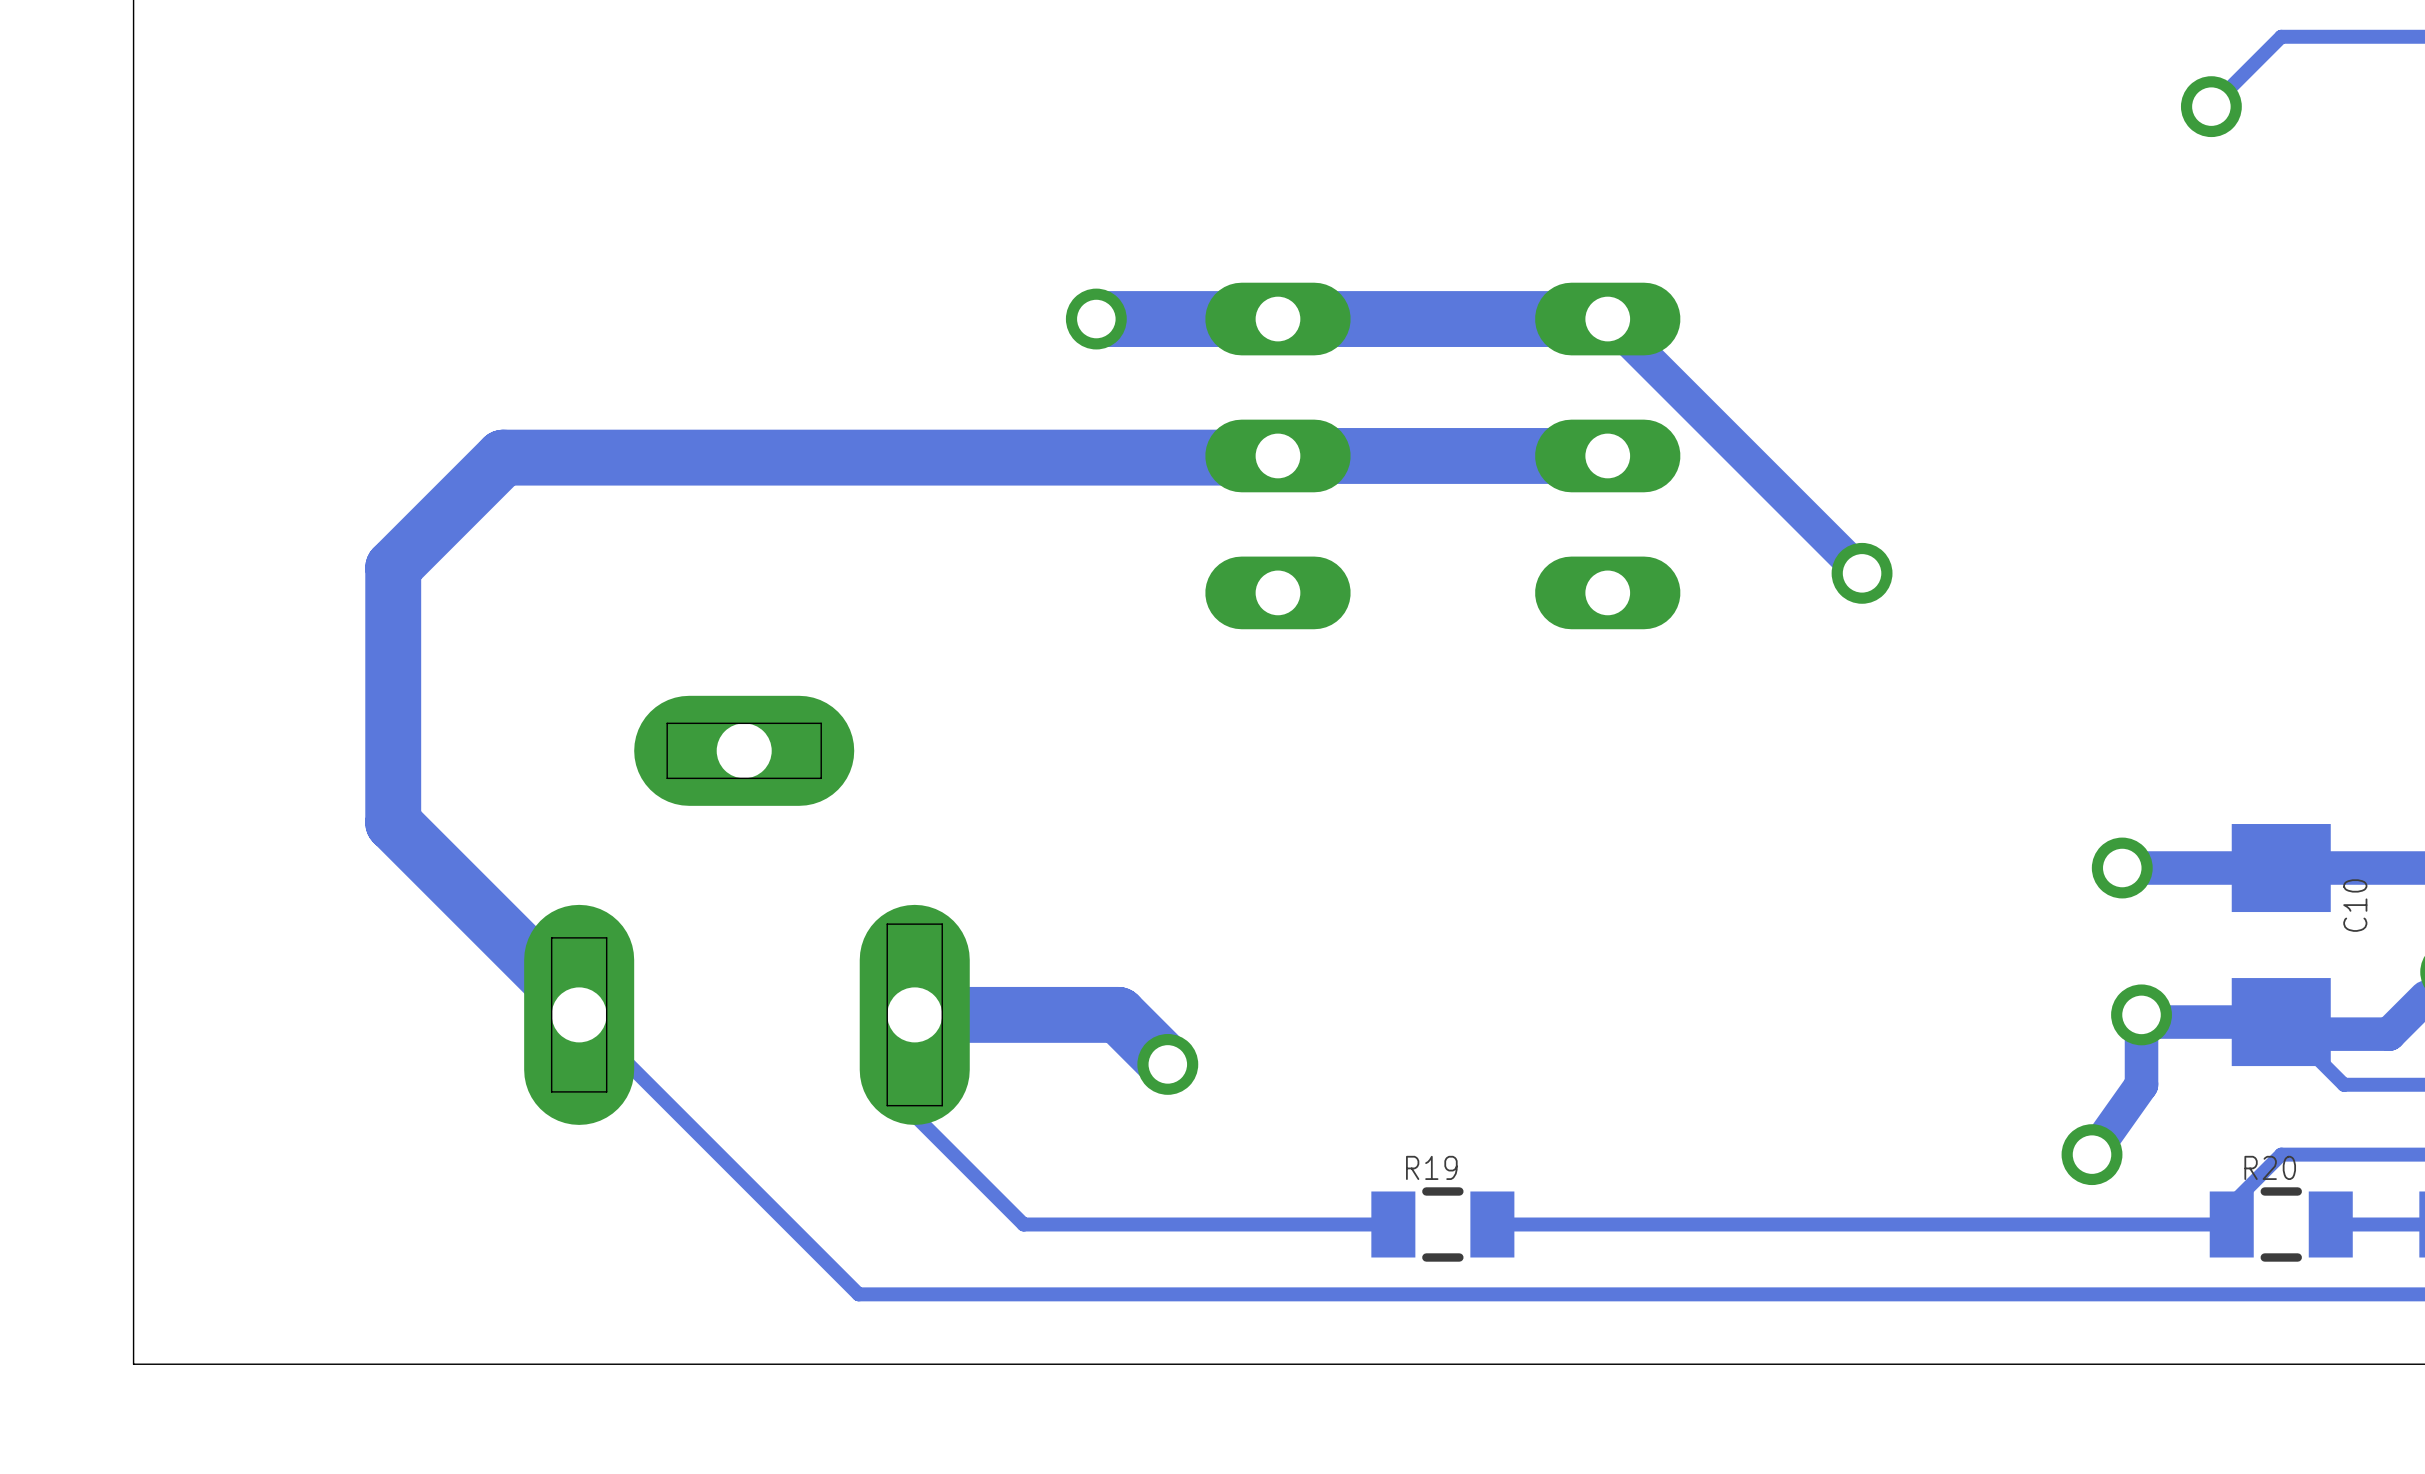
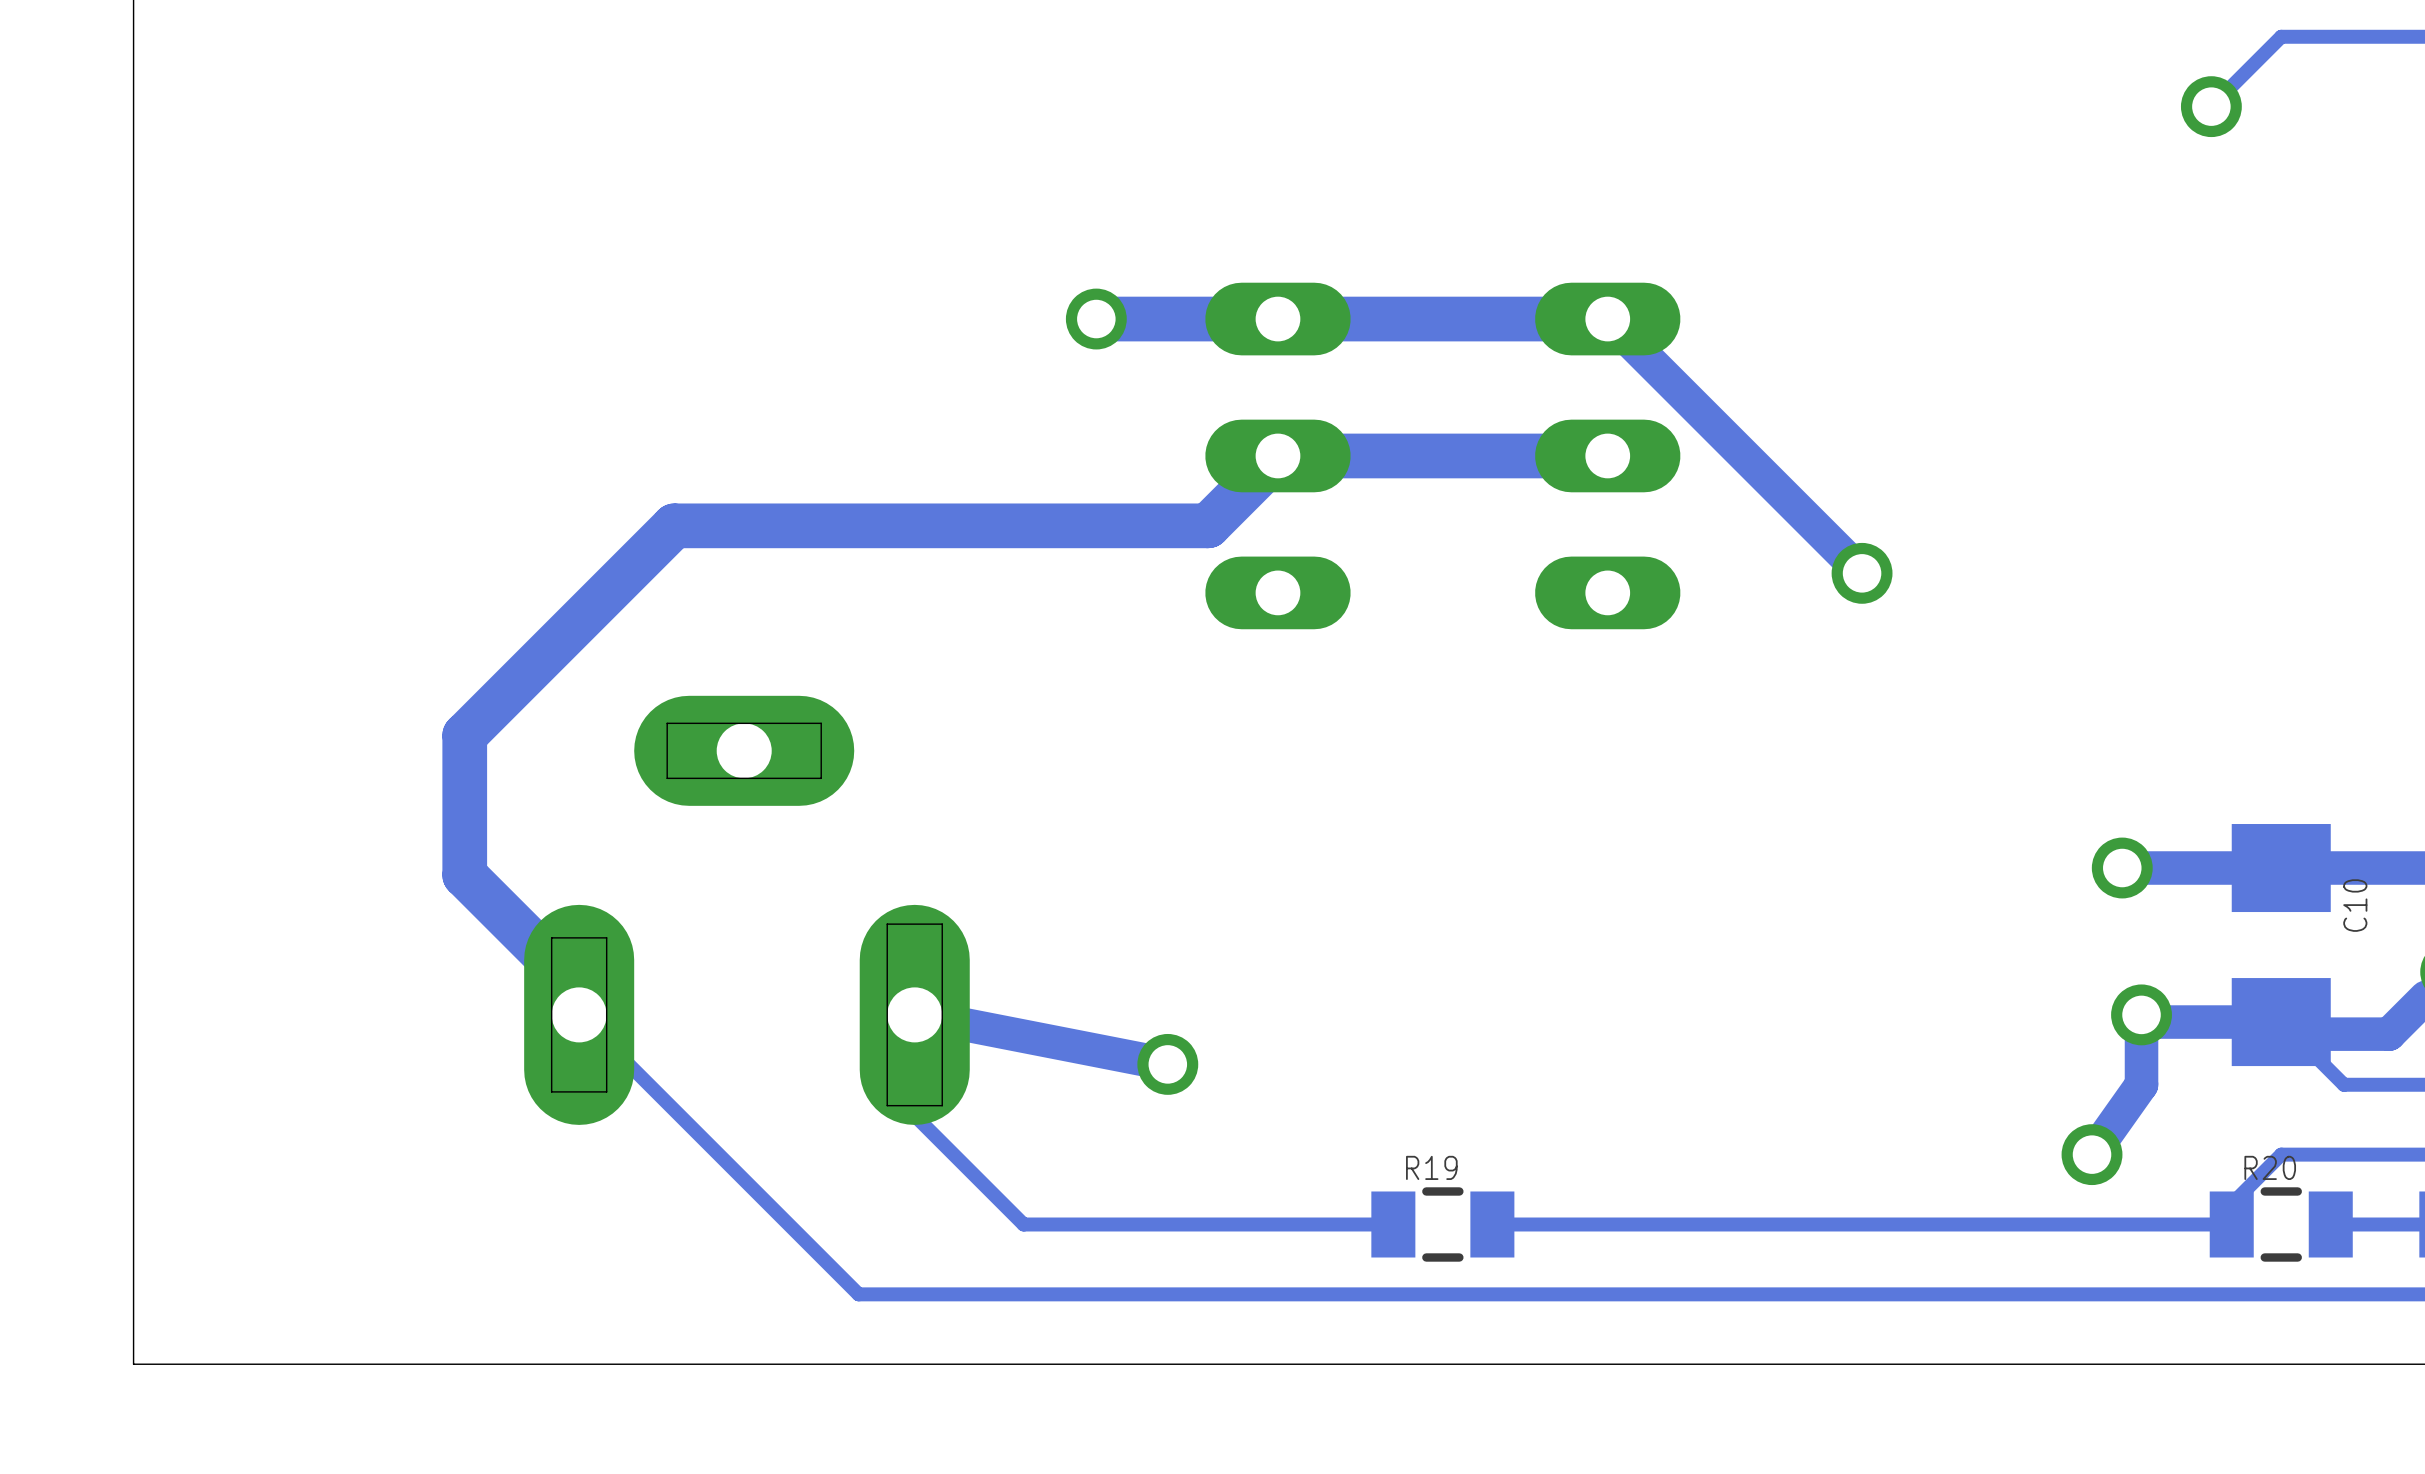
track width: thick (1607, 319) (1096, 319) -> thin (1607, 319) (1096, 319)
track width: thick (1607, 455) (1277, 455) (1276, 457) -> thin (1607, 455) (1277, 455) (1276, 457)
track: (1276, 457) (503, 457) (393, 567) (393, 822) (579, 1008) -> (1276, 457) (1208, 525) (674, 525) (464, 735) (464, 875) (579, 989) (579, 1008)
track: (914, 1014) (1118, 1014) (1167, 1064) -> (914, 1014) (1167, 1064)

